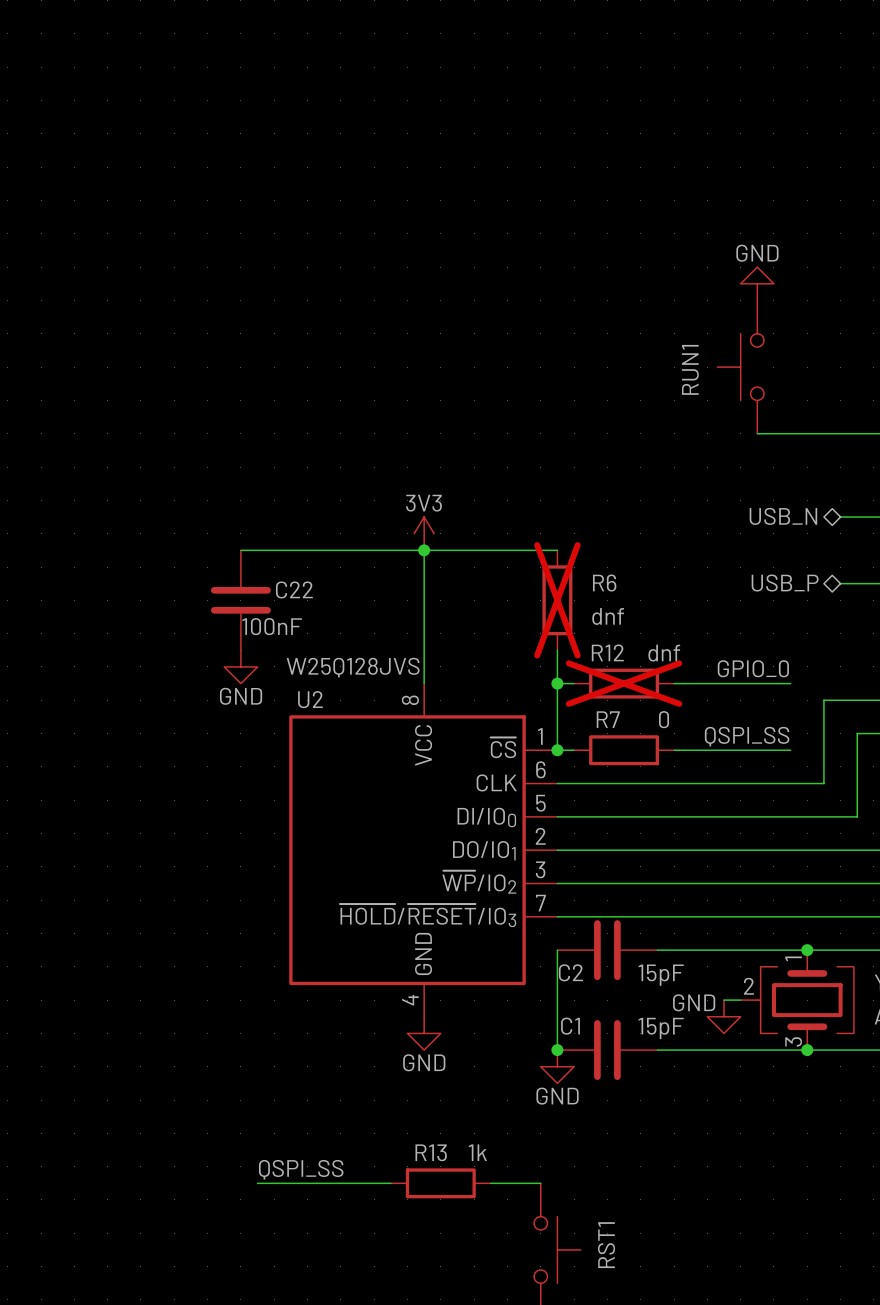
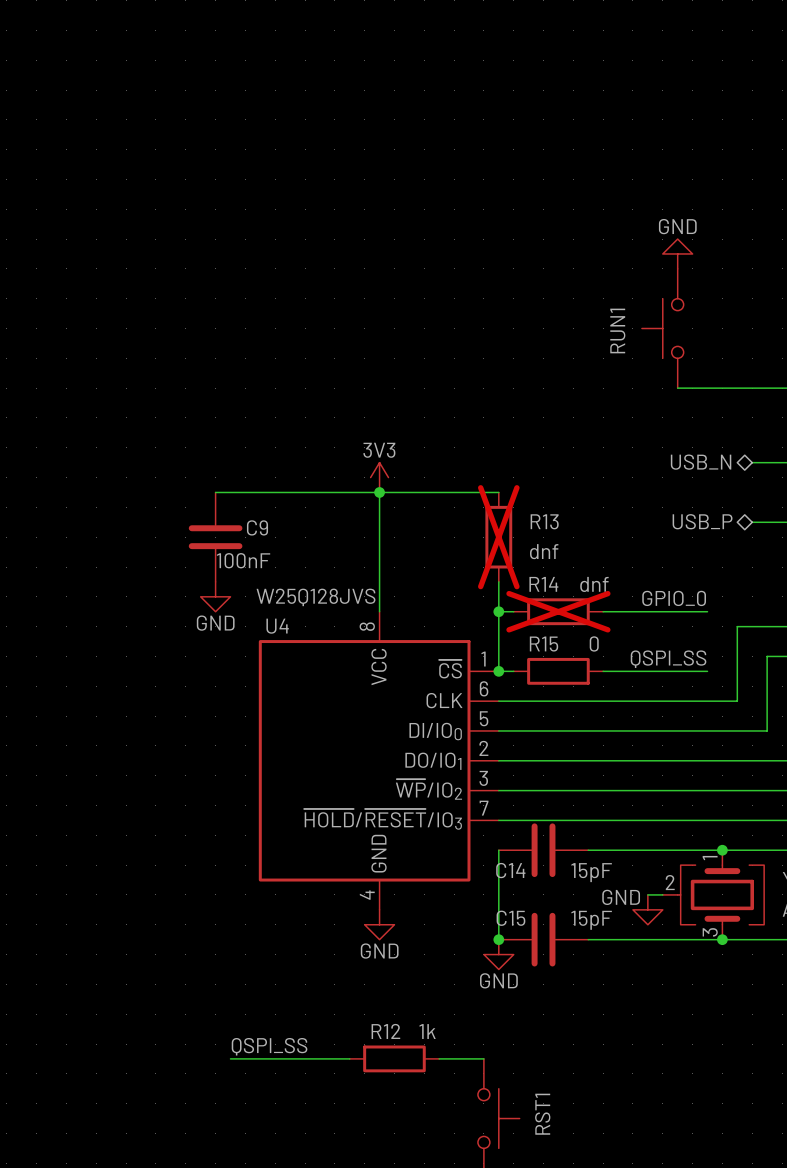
R6 name: R6 (604, 583) -> R13 (544, 521)
C22 name: C22 (294, 589) -> C9 (257, 527)
R12 name: R12 (607, 652) -> R14 (543, 584)
U2 name: U2 (310, 699) -> U4 (277, 626)
R7 name: R7 (608, 719) -> R15 (544, 644)
C2 name: C2 (570, 972) -> C14 (510, 870)
C1 name: C1 (570, 1026) -> C15 (510, 918)
R13 name: R13 (431, 1152) -> R12 (385, 1031)

